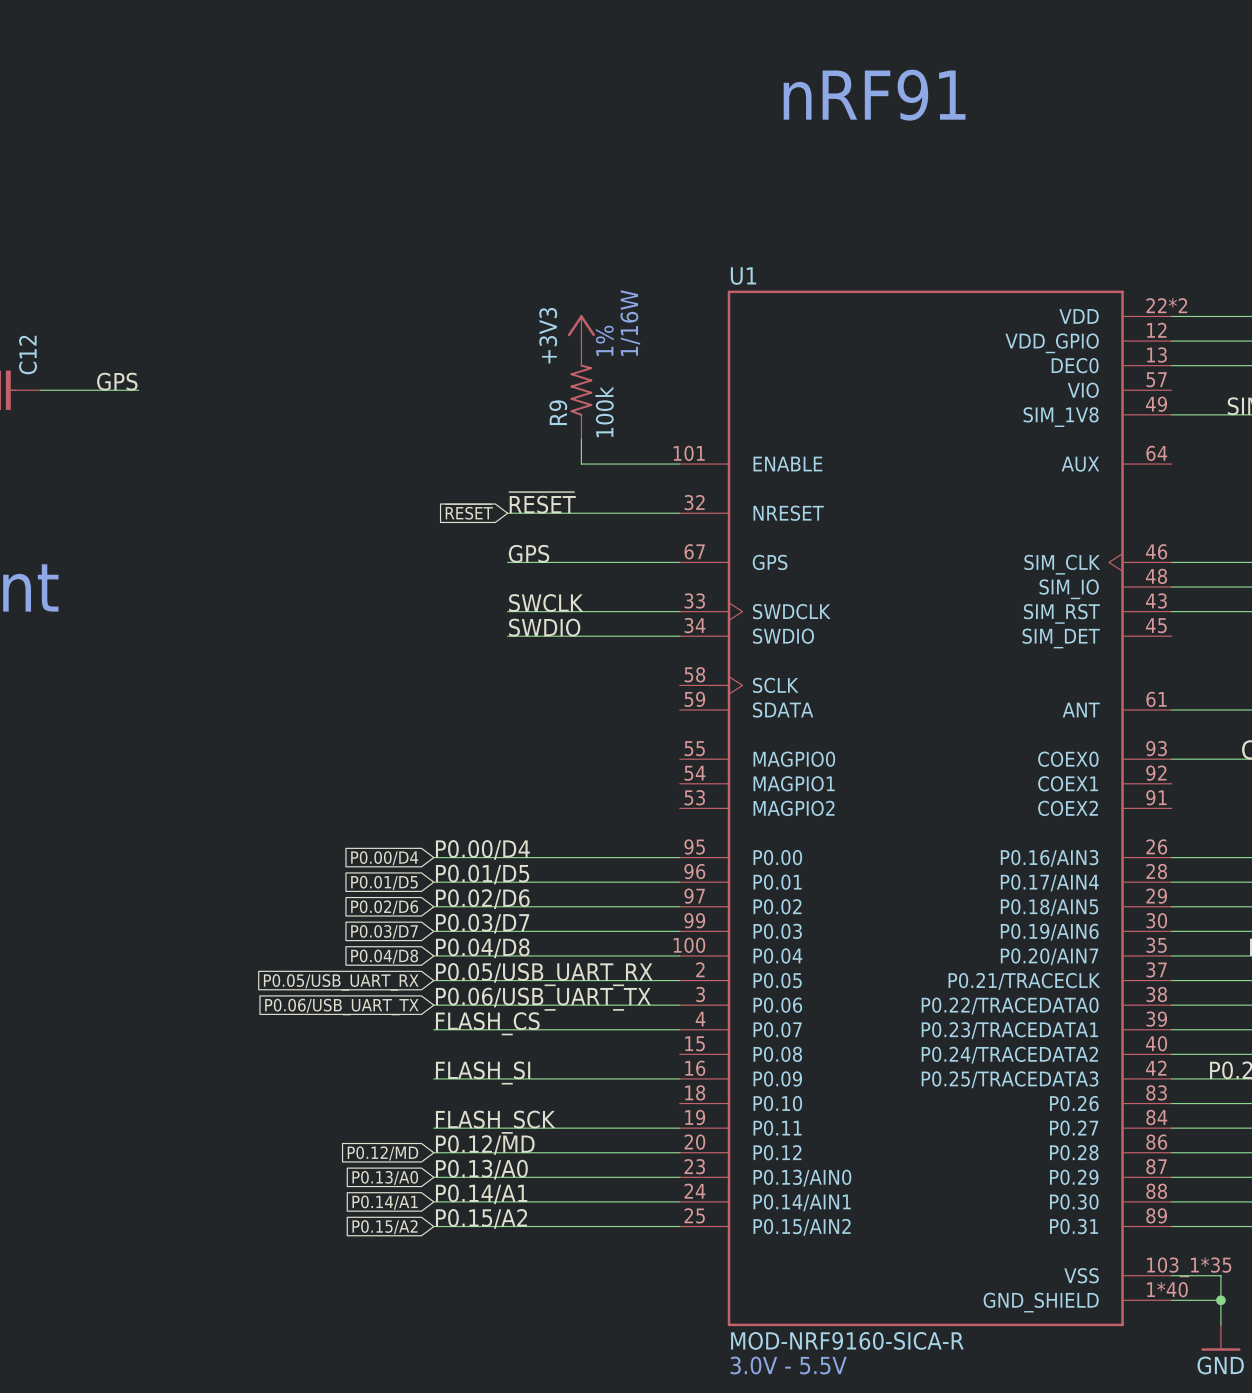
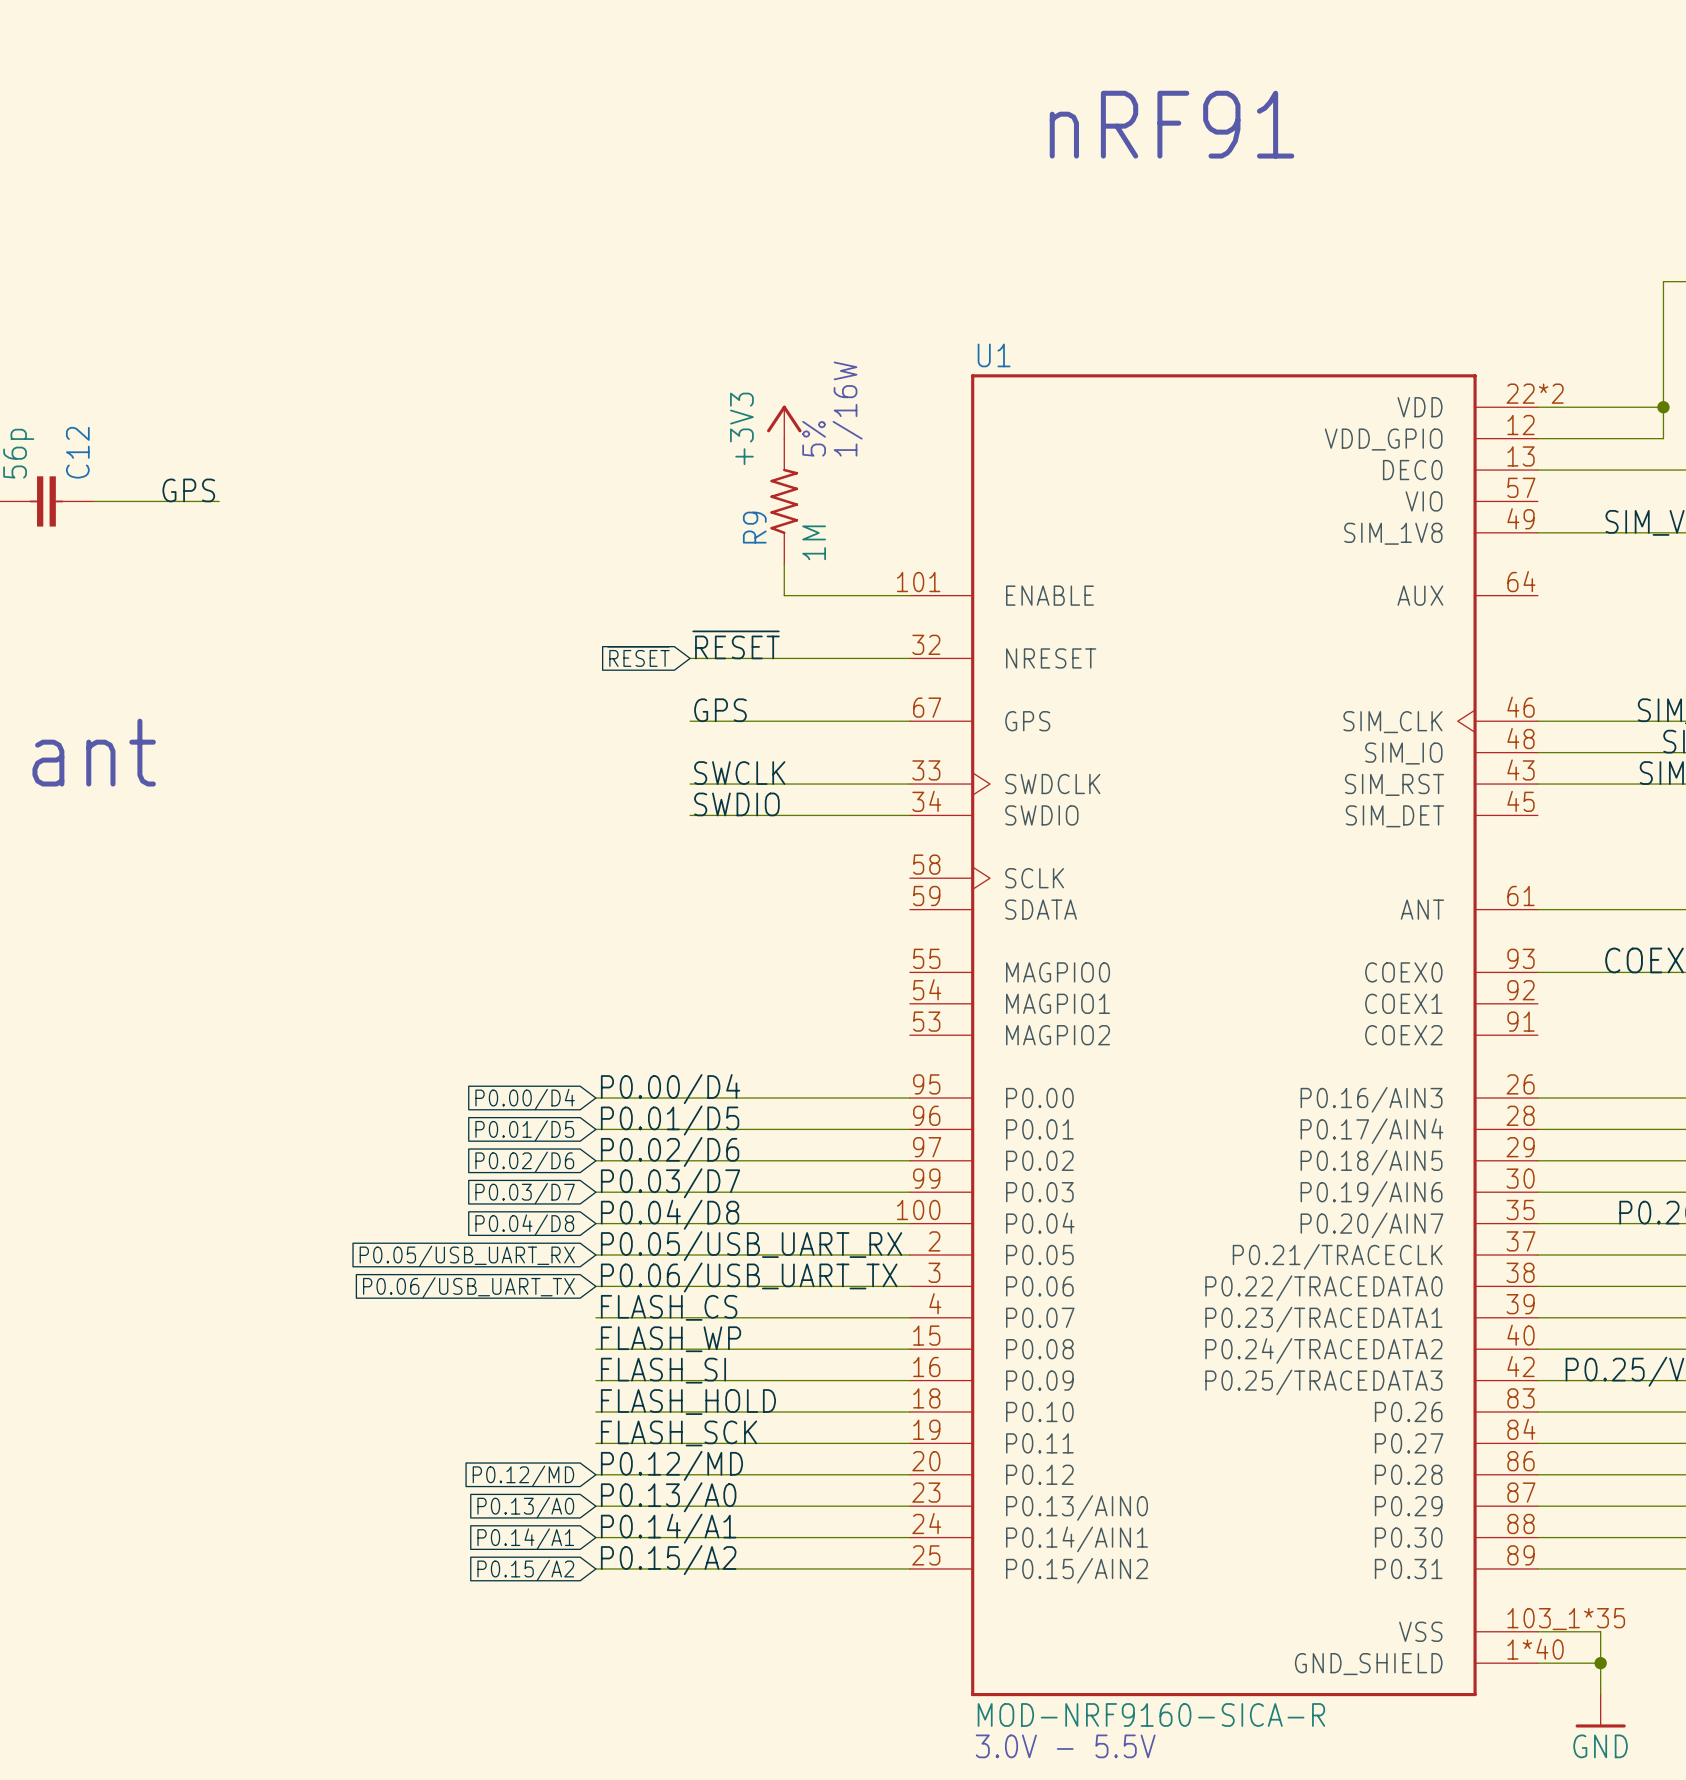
R9 text: 1% (604, 340) -> 5% (814, 438)
R9 value: 100k (604, 411) -> 1M (814, 542)
label: none -> FLASH_WP (671, 1339)
wire: none -> (595, 1349) (909, 1349)
label: none -> FLASH_HOLD (688, 1402)
wire: none -> (595, 1411) (909, 1411)

